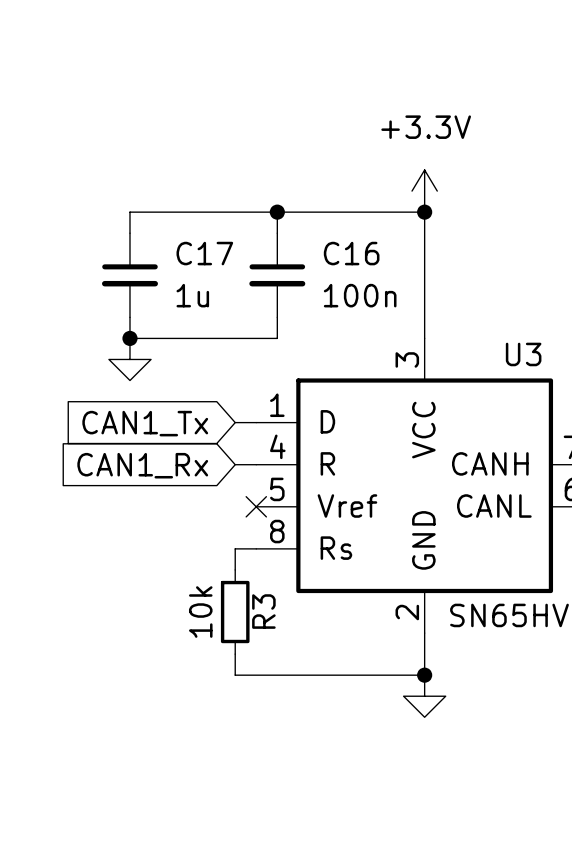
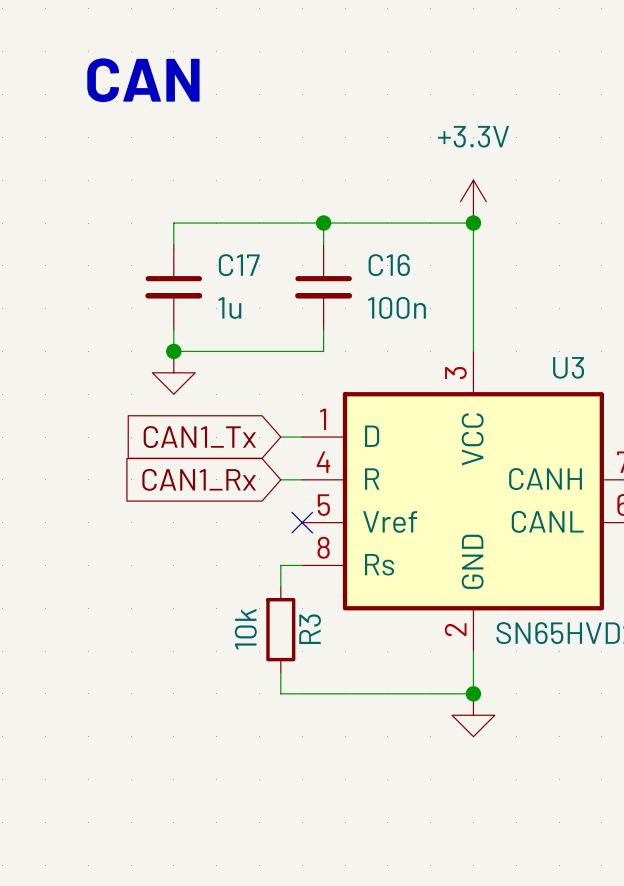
text: none -> CAN (143, 80)

